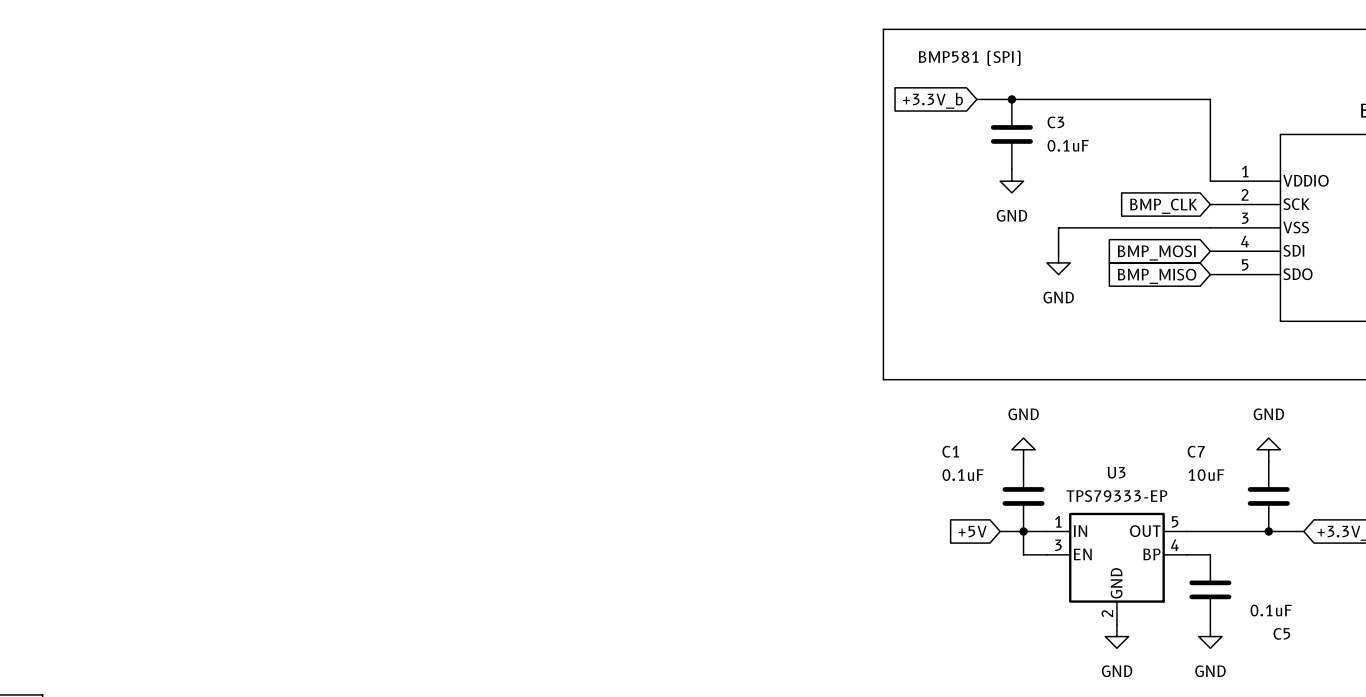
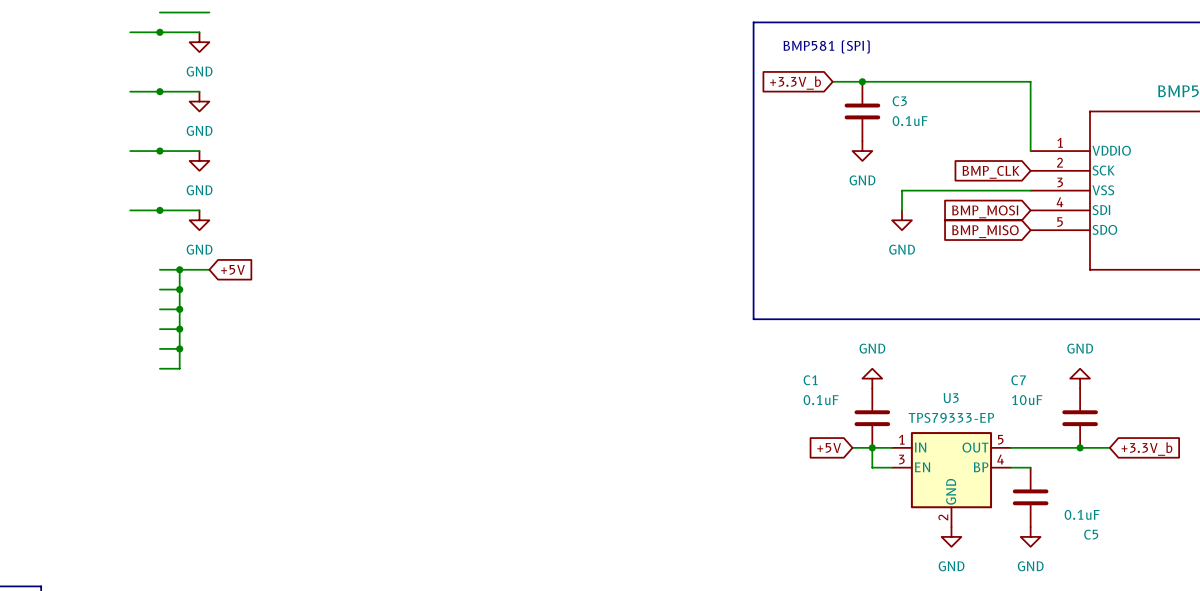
wire: none -> (159, 12) (209, 12)
wire: none -> (130, 32) (199, 32)
junction: none -> (159, 32)
power symbol: none -> GND (199, 42)
wire: none -> (130, 91) (199, 91)
junction: none -> (159, 91)
power symbol: none -> GND (199, 101)
wire: none -> (130, 151) (199, 151)
junction: none -> (159, 151)
power symbol: none -> GND (199, 160)
wire: none -> (130, 210) (199, 210)
junction: none -> (159, 210)
power symbol: none -> GND (199, 220)
wire: none -> (159, 269) (209, 269)
wire: none -> (179, 269) (179, 368) (159, 368)
junction: none -> (179, 269)
global label: none -> +5V (233, 269)
wire: none -> (159, 289) (179, 289)
junction: none -> (179, 289)
wire: none -> (159, 309) (179, 309)
junction: none -> (179, 309)
wire: none -> (159, 329) (179, 329)
junction: none -> (179, 329)
wire: none -> (159, 348) (179, 348)
junction: none -> (179, 348)

